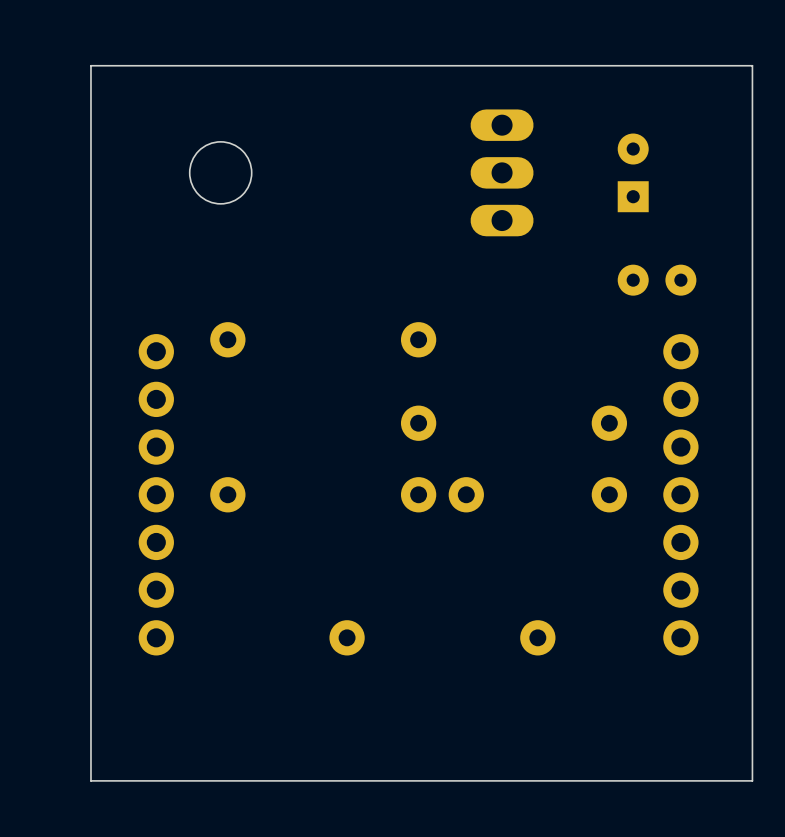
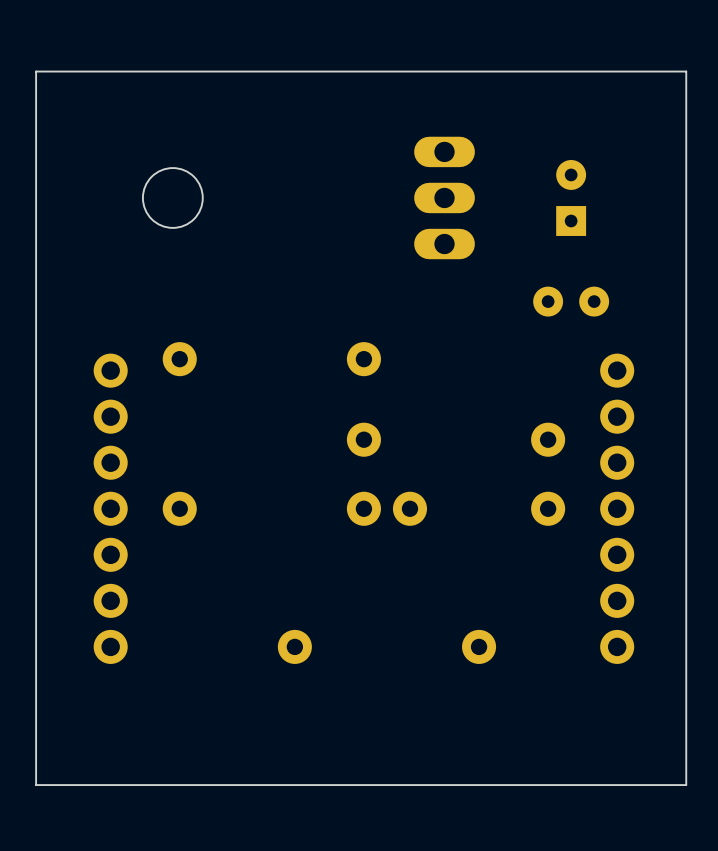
board edge: (752, 65) (90, 65) (90, 780) -> (686, 94) (686, 71) (36, 71) (36, 785) (47, 785)
part position: (657, 280) -> (571, 301)

